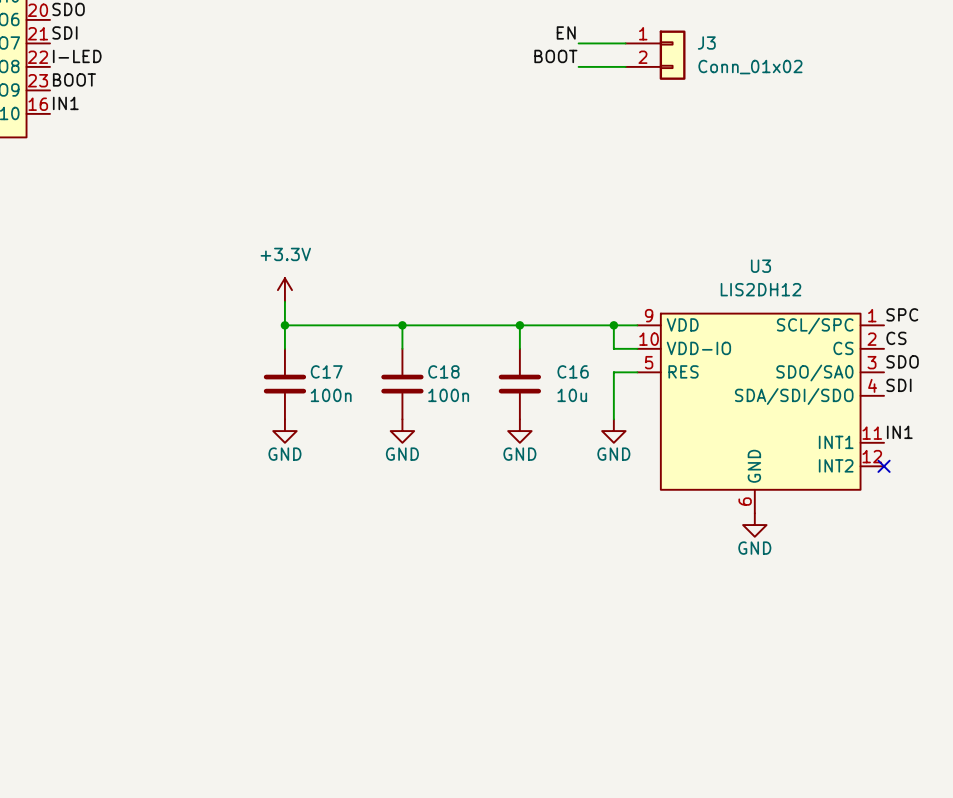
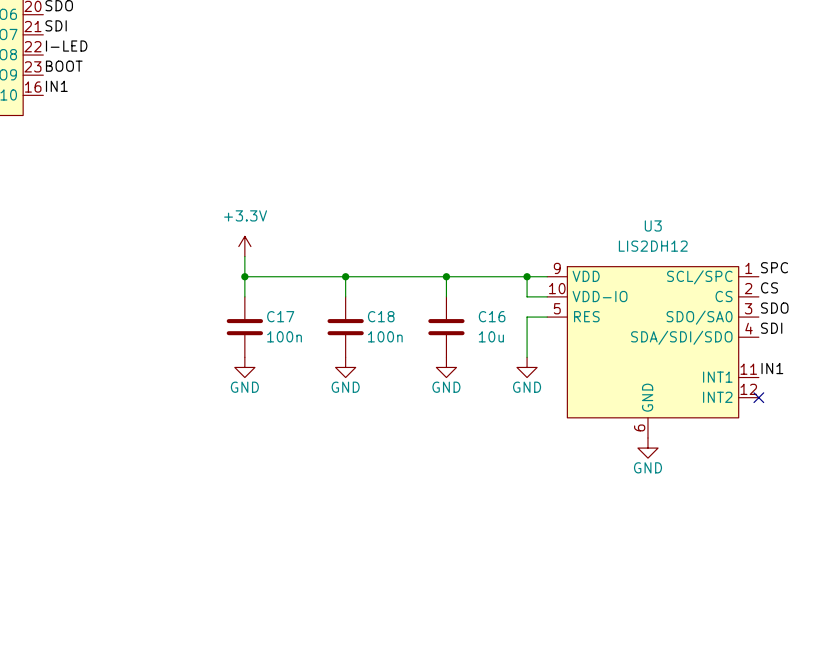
label: EN (566, 32) -> none
wire: (578, 43) (625, 43) -> none
J3: Conn_01x02 (655, 55) -> none
label: BOOT (555, 56) -> none
wire: (578, 66) (625, 66) -> none

